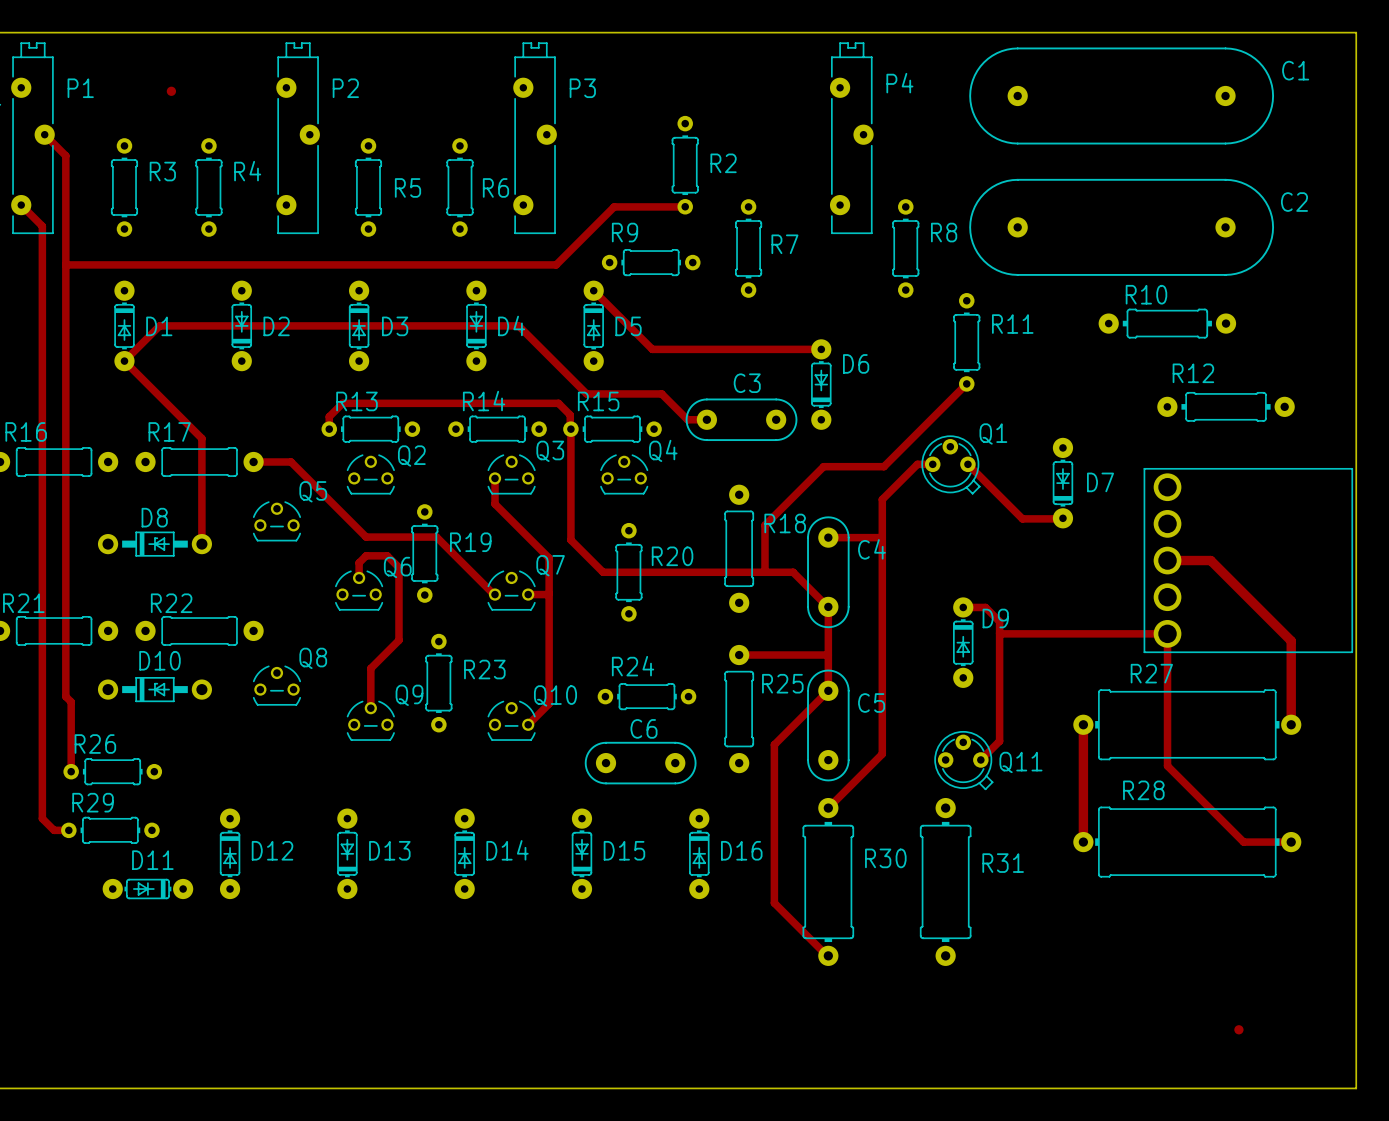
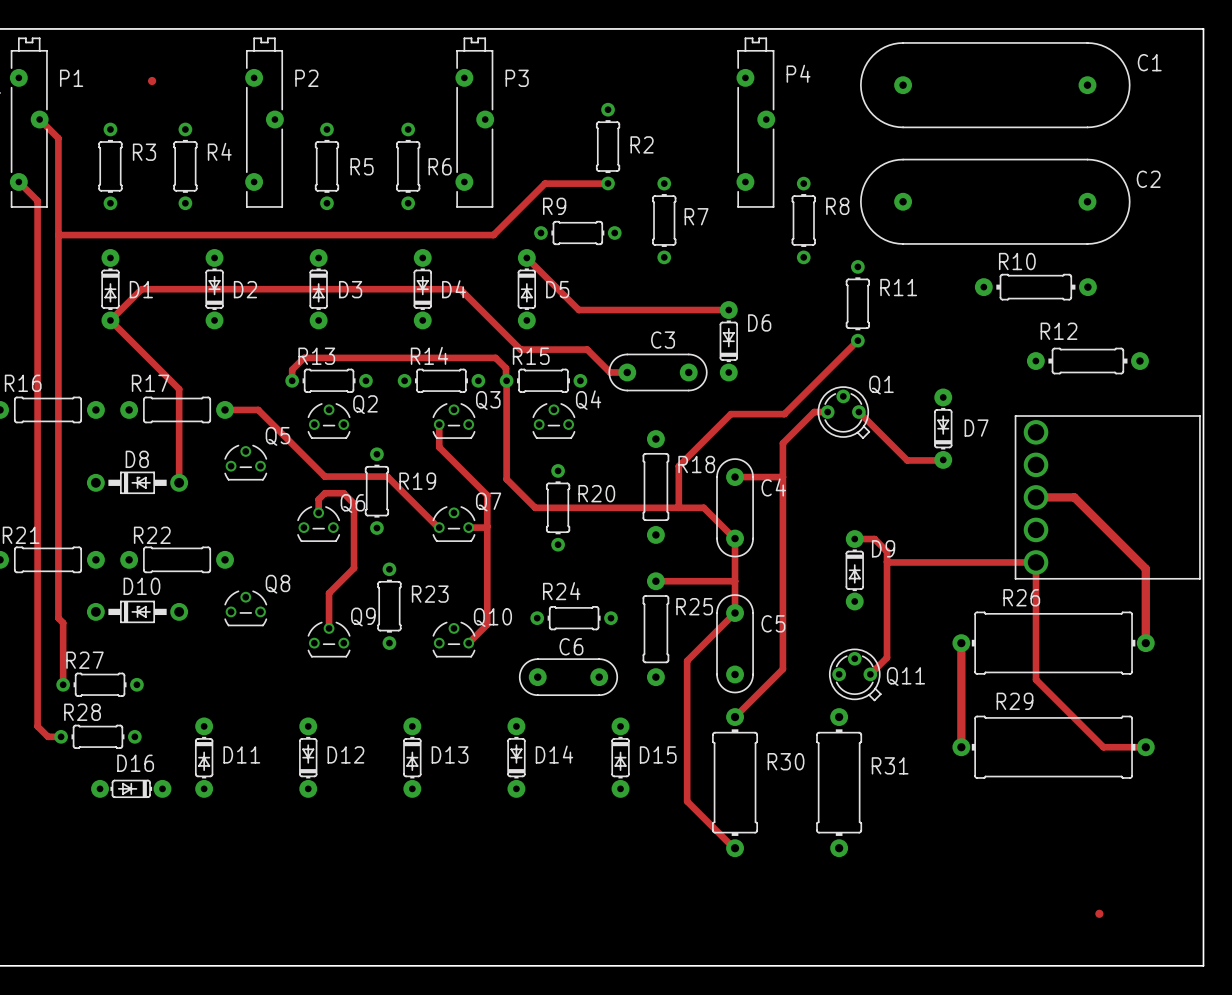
R27 name: R27 (1151, 673) -> R26 (1021, 597)
R26 name: R26 (95, 744) -> R27 (84, 660)
R28 name: R28 (1143, 790) -> R29 (1015, 701)
R29 name: R29 (93, 802) -> R28 (82, 712)
D12 name: D12 (272, 850) -> D11 (241, 754)
D13 name: D13 (389, 850) -> D12 (345, 754)
D14 name: D14 (507, 850) -> D13 (450, 754)
D15 name: D15 (624, 850) -> D14 (554, 754)
D16 name: D16 (741, 850) -> D15 (658, 754)
D11 name: D11 (152, 860) -> D16 (135, 763)

